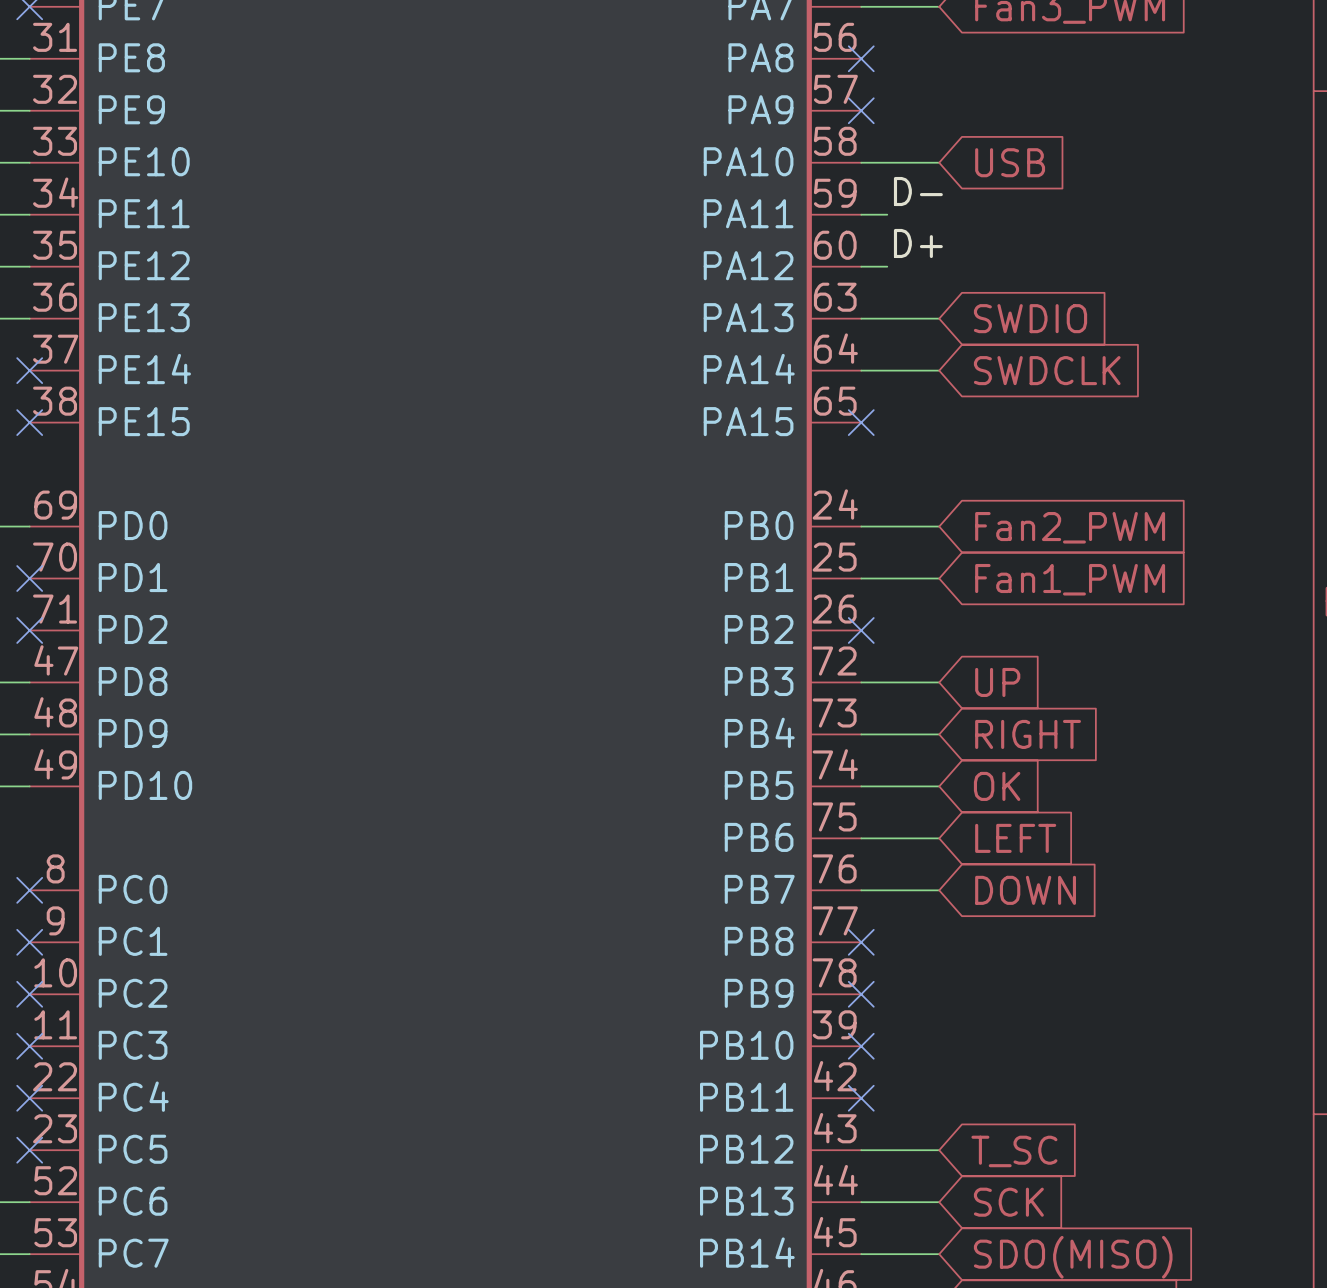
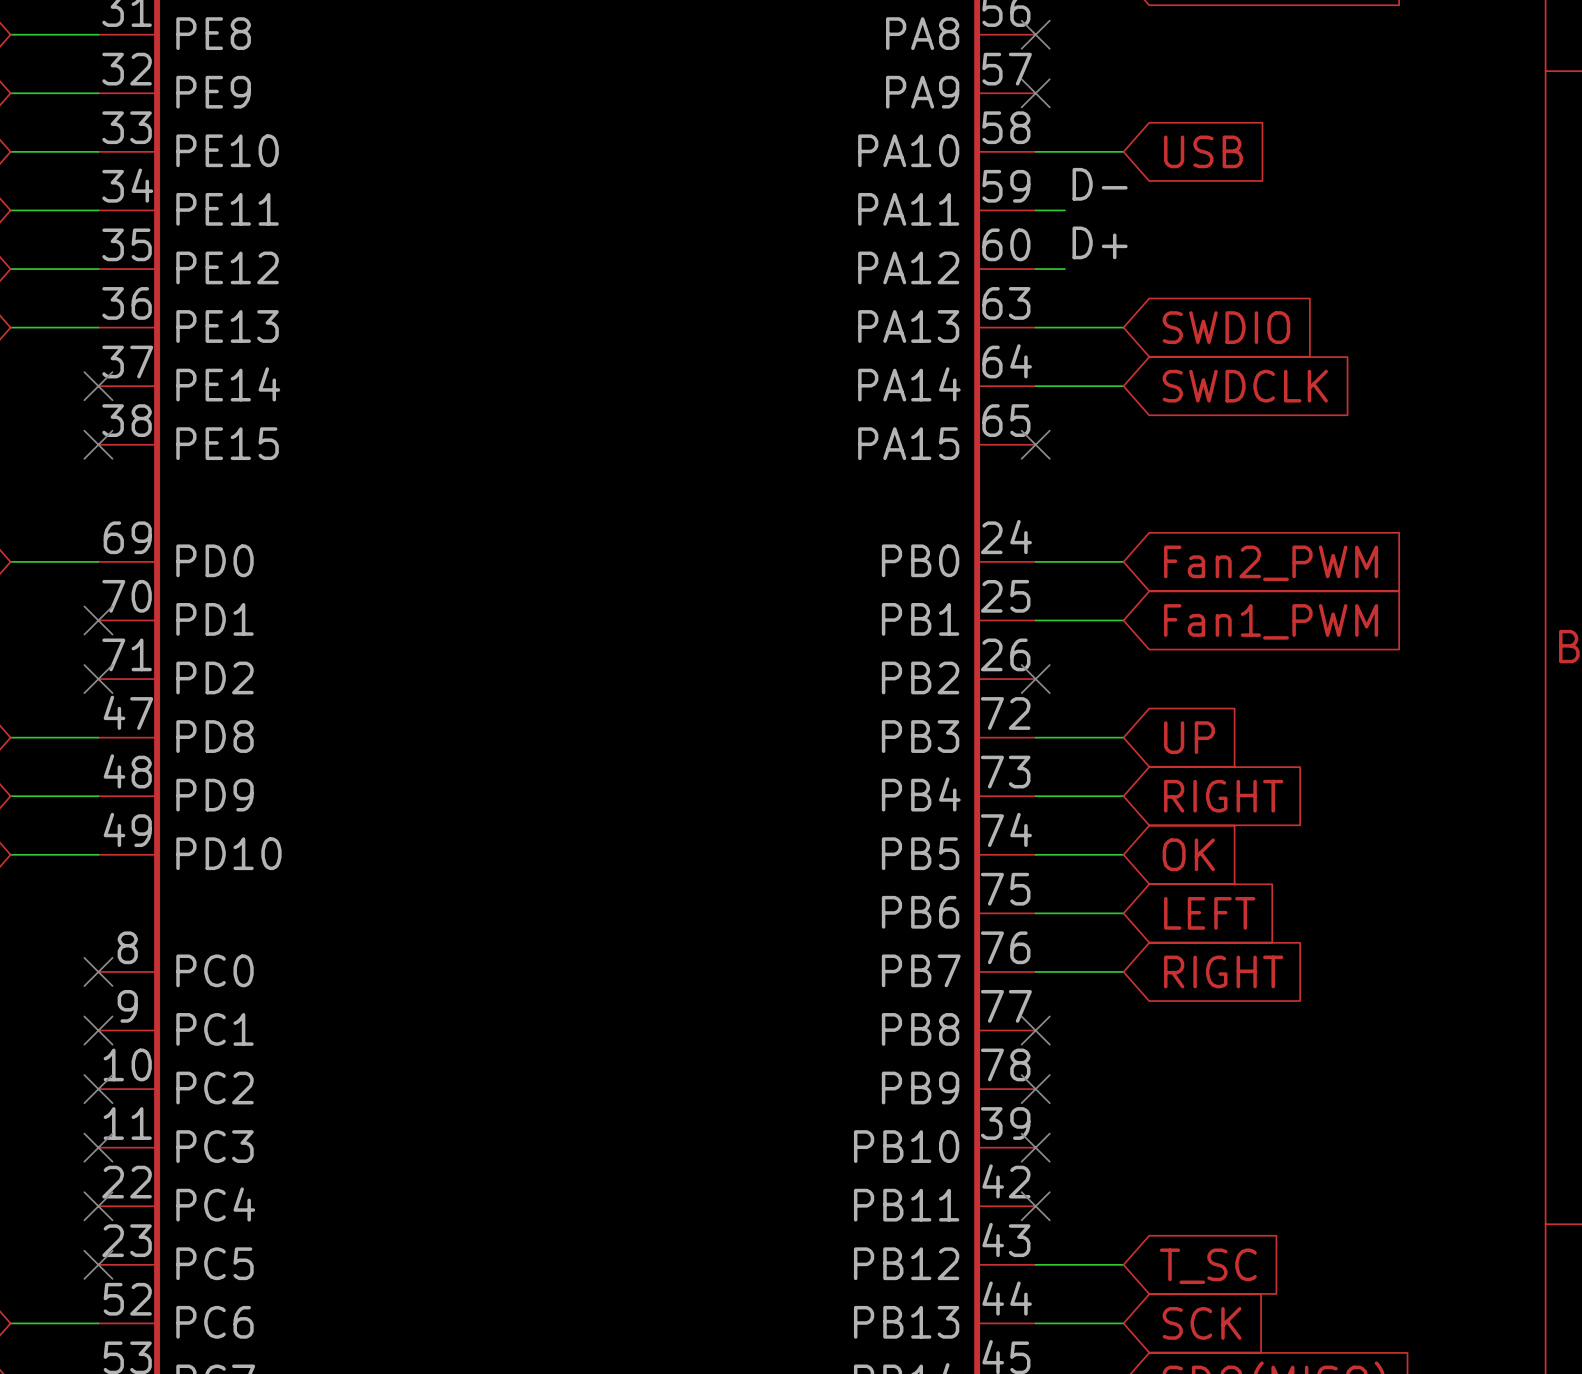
global label: DOWN (1025, 890) -> RIGHT (1223, 971)

